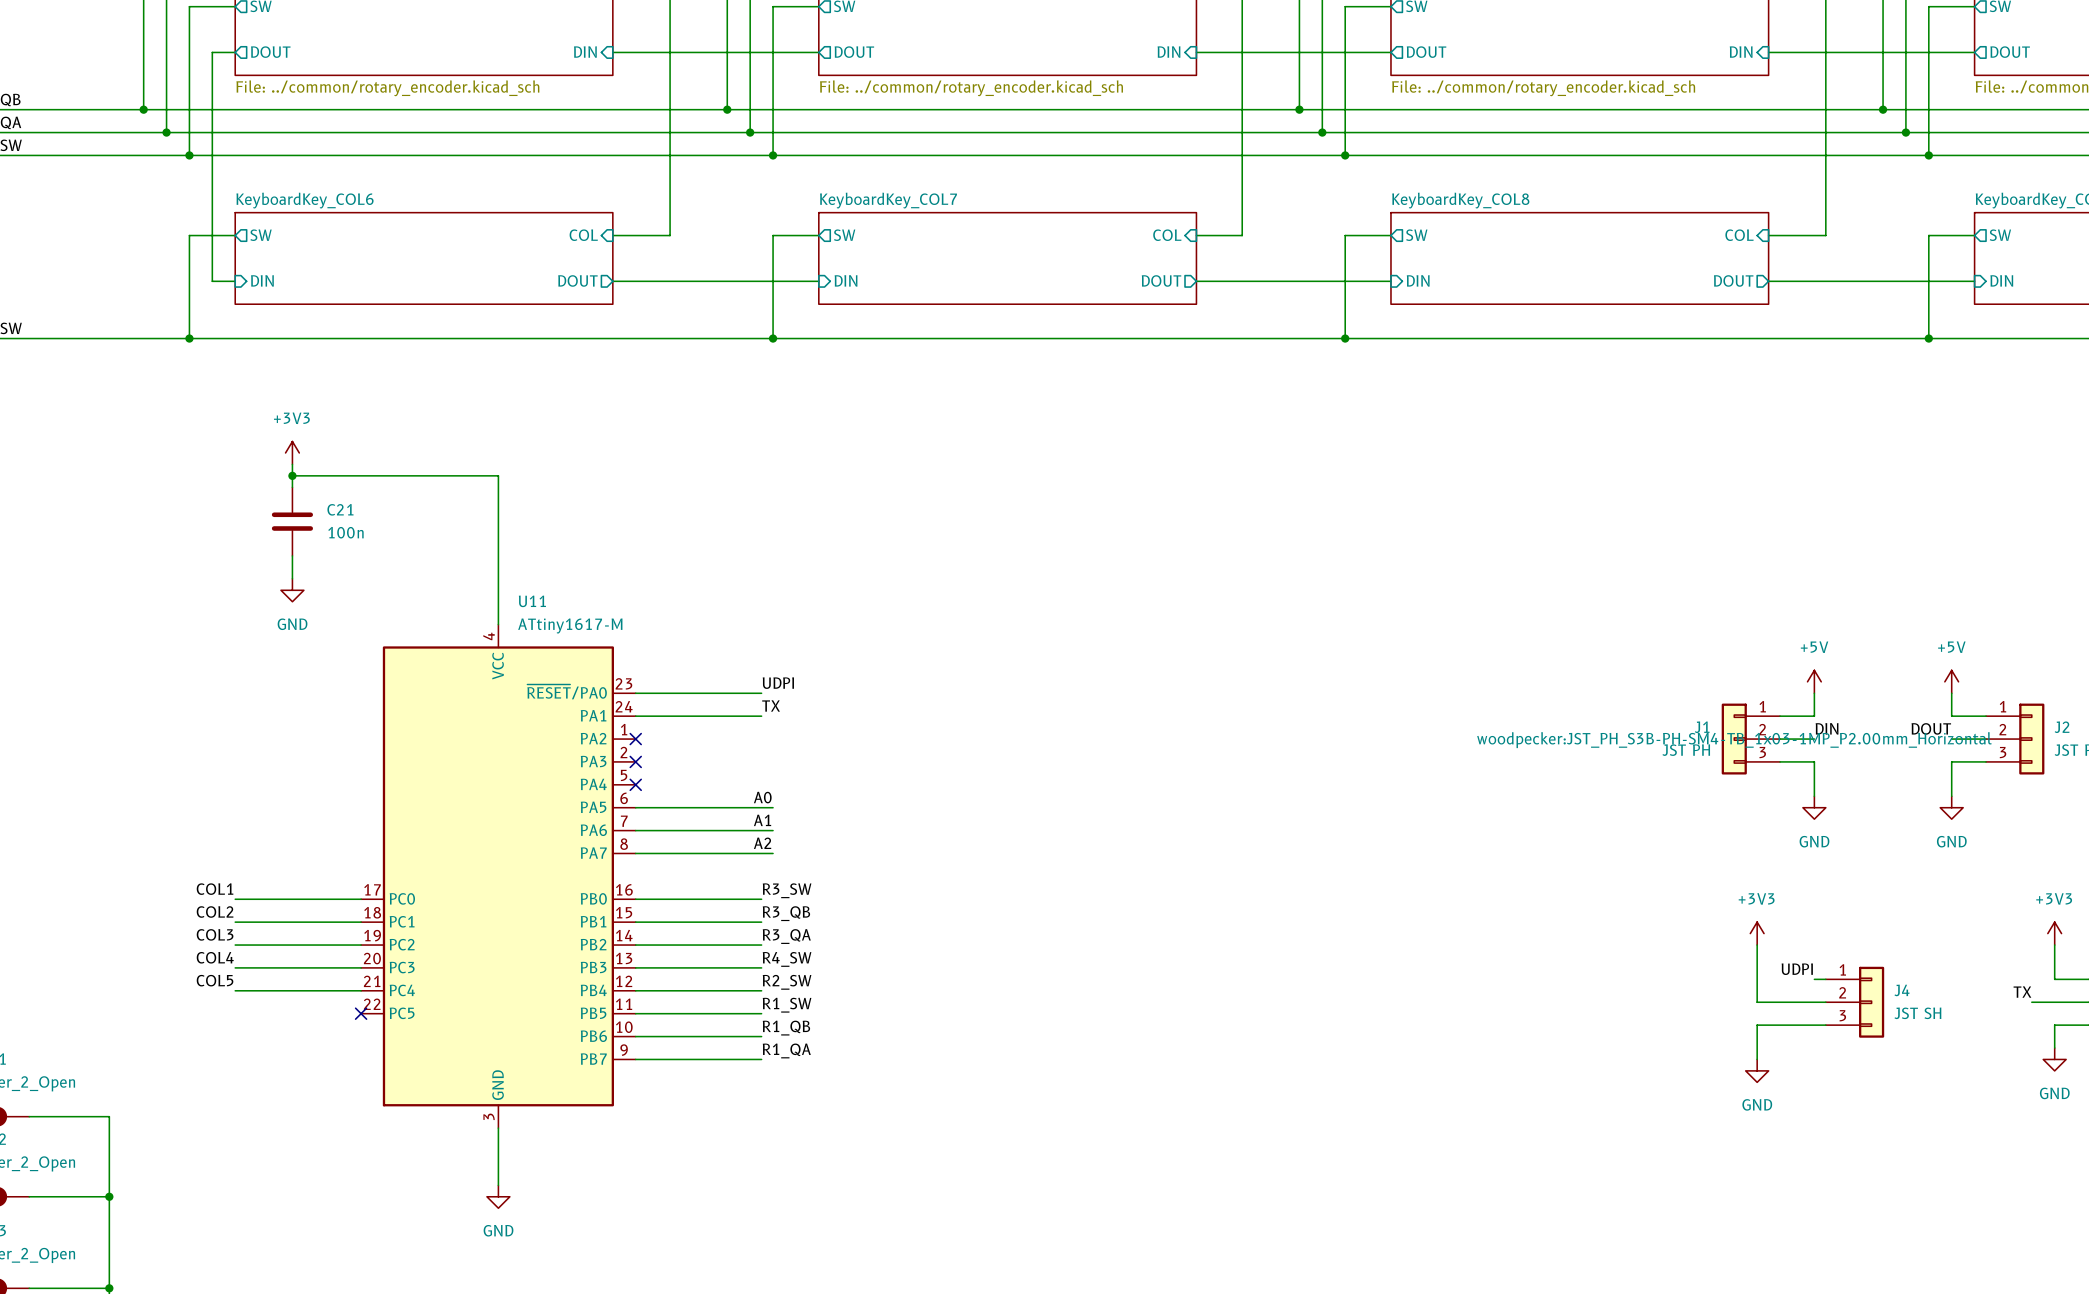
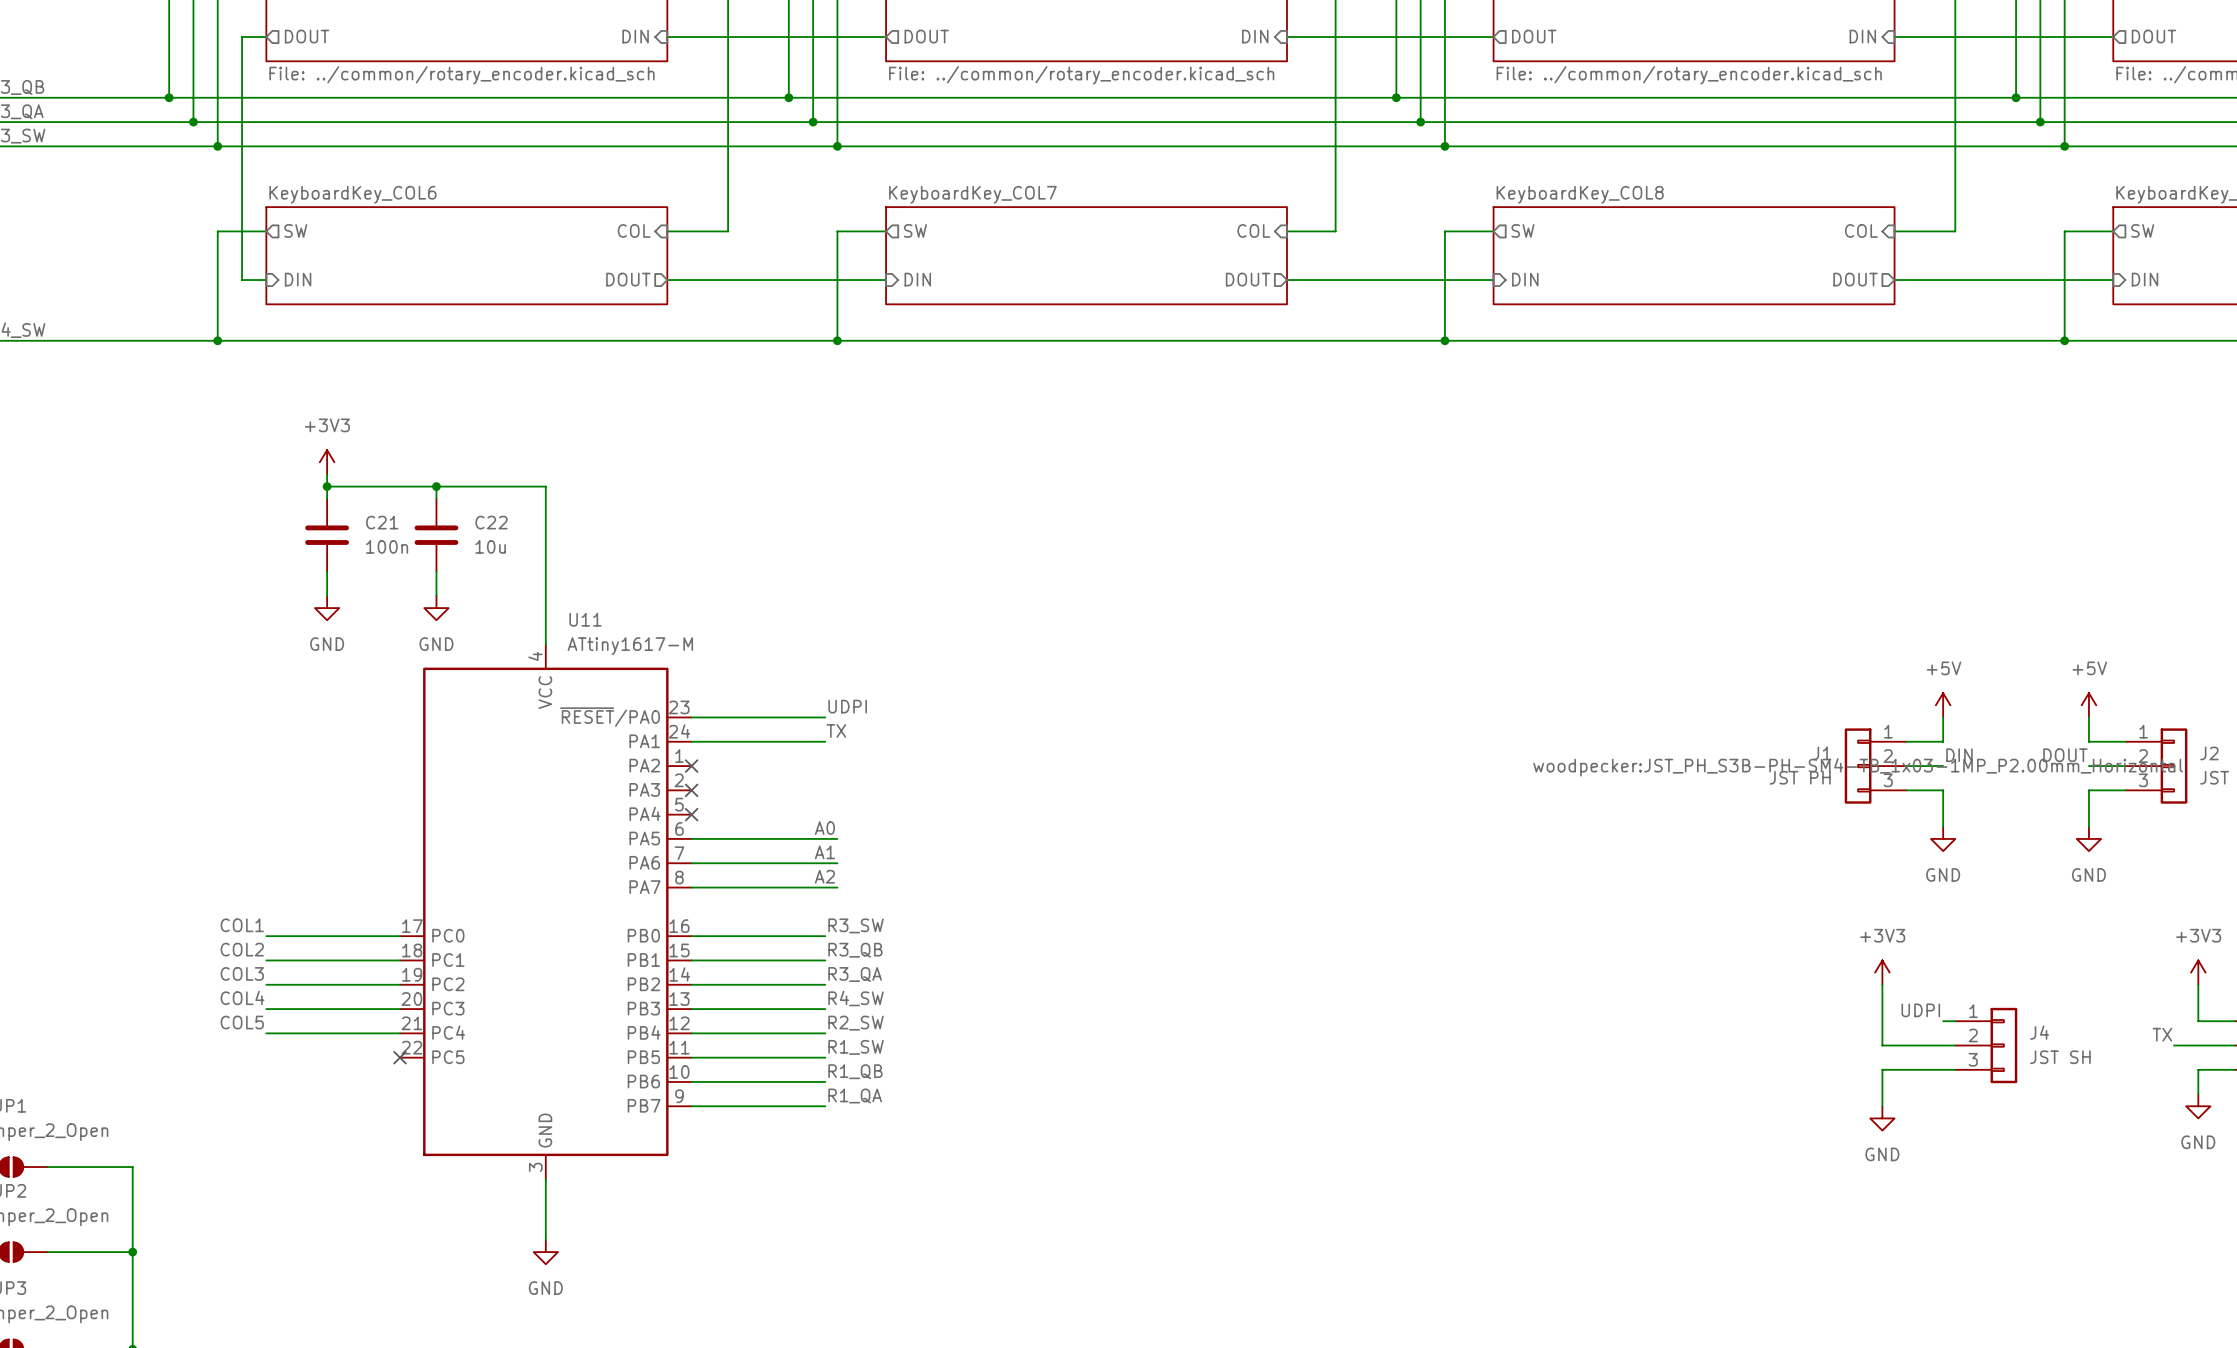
wire: none -> (436, 486) (436, 498)
junction: none -> (436, 486)
C22: none -> 10u (436, 535)
wire: none -> (436, 571) (436, 595)
power symbol: none -> GND (436, 608)

